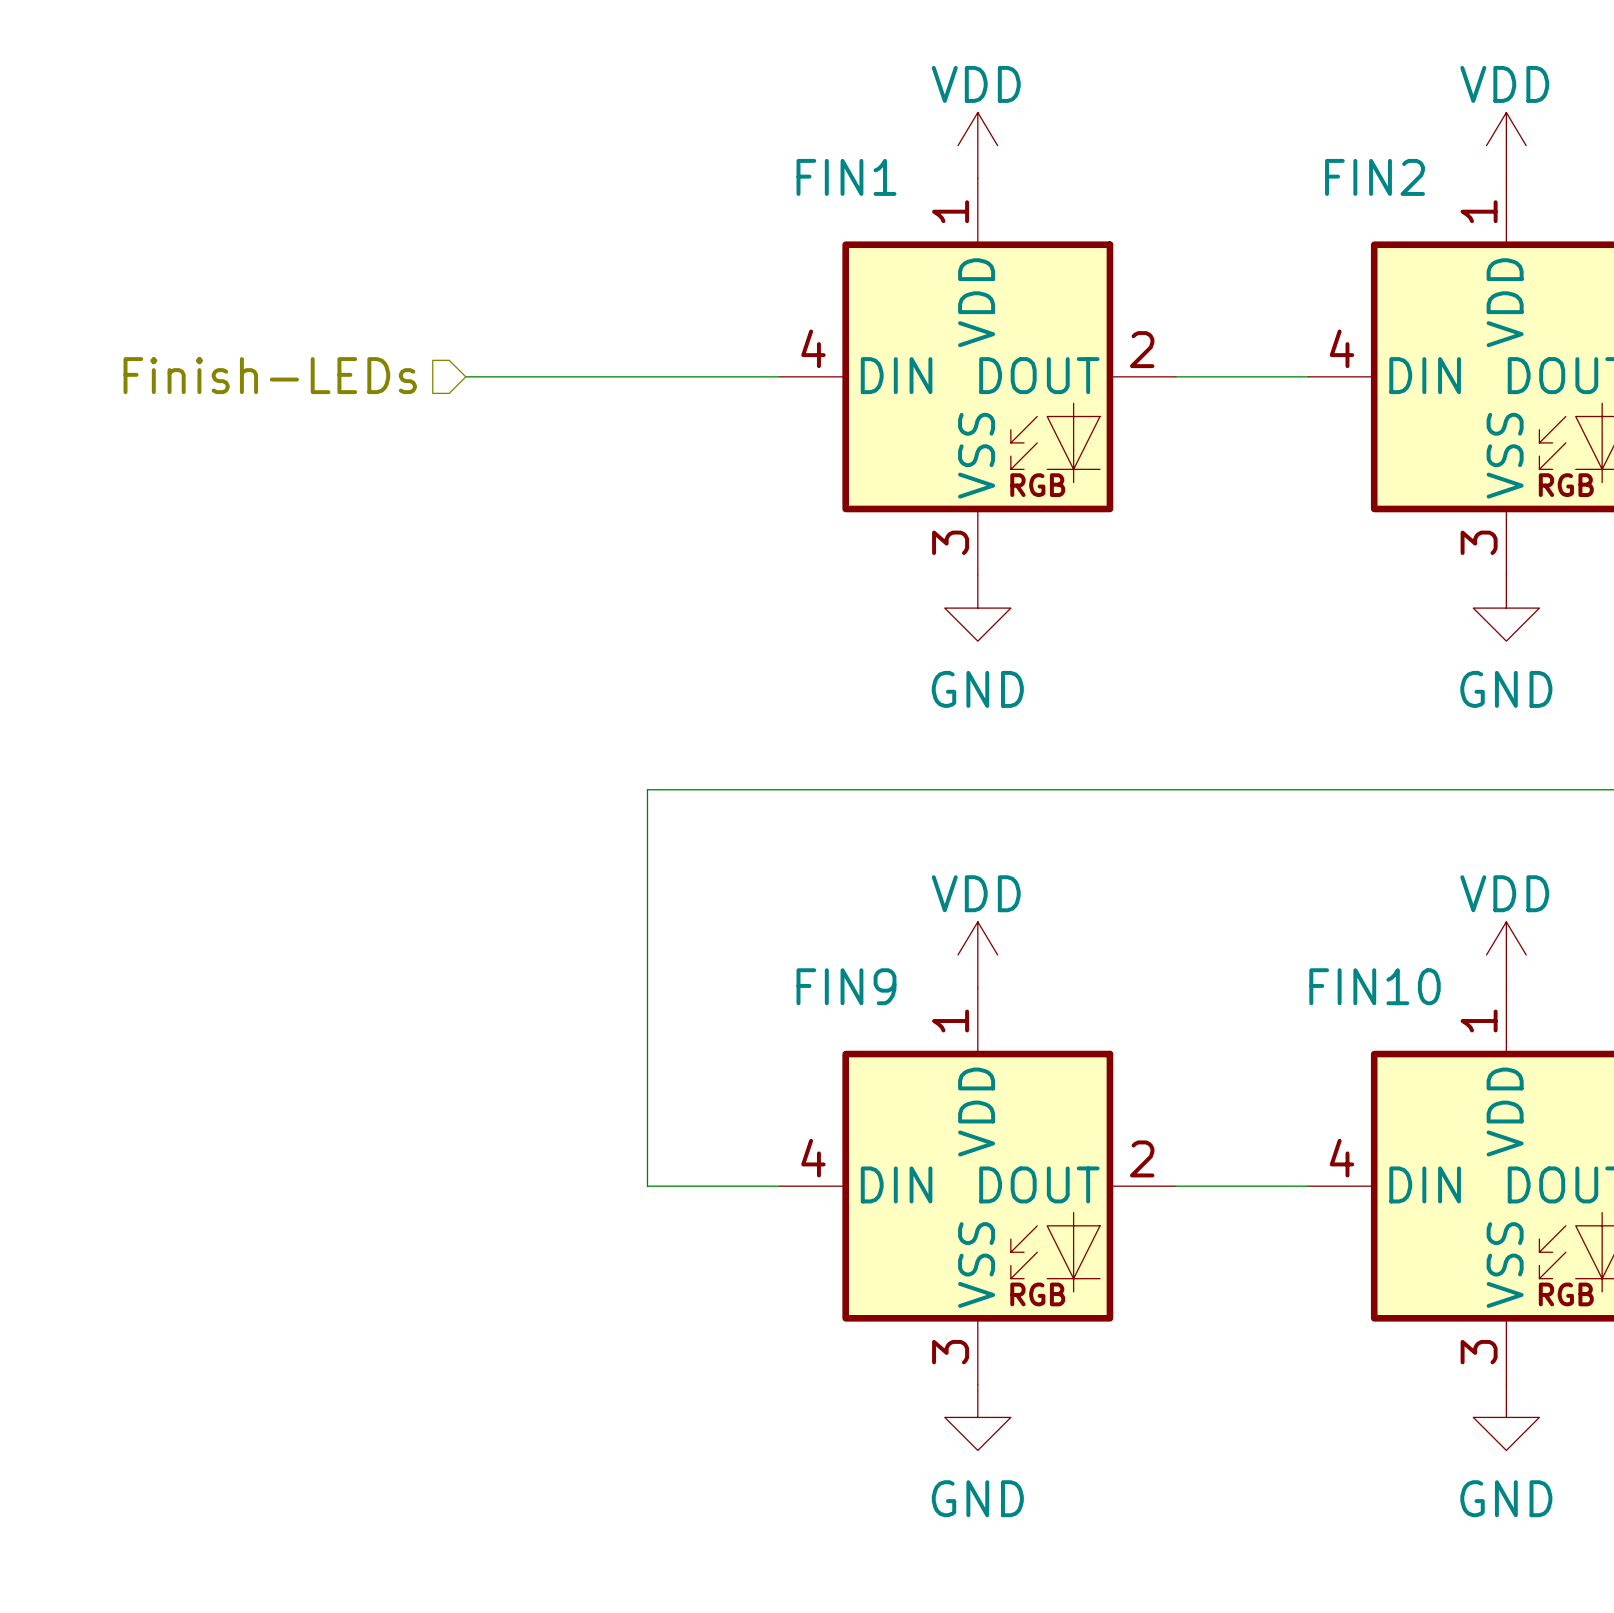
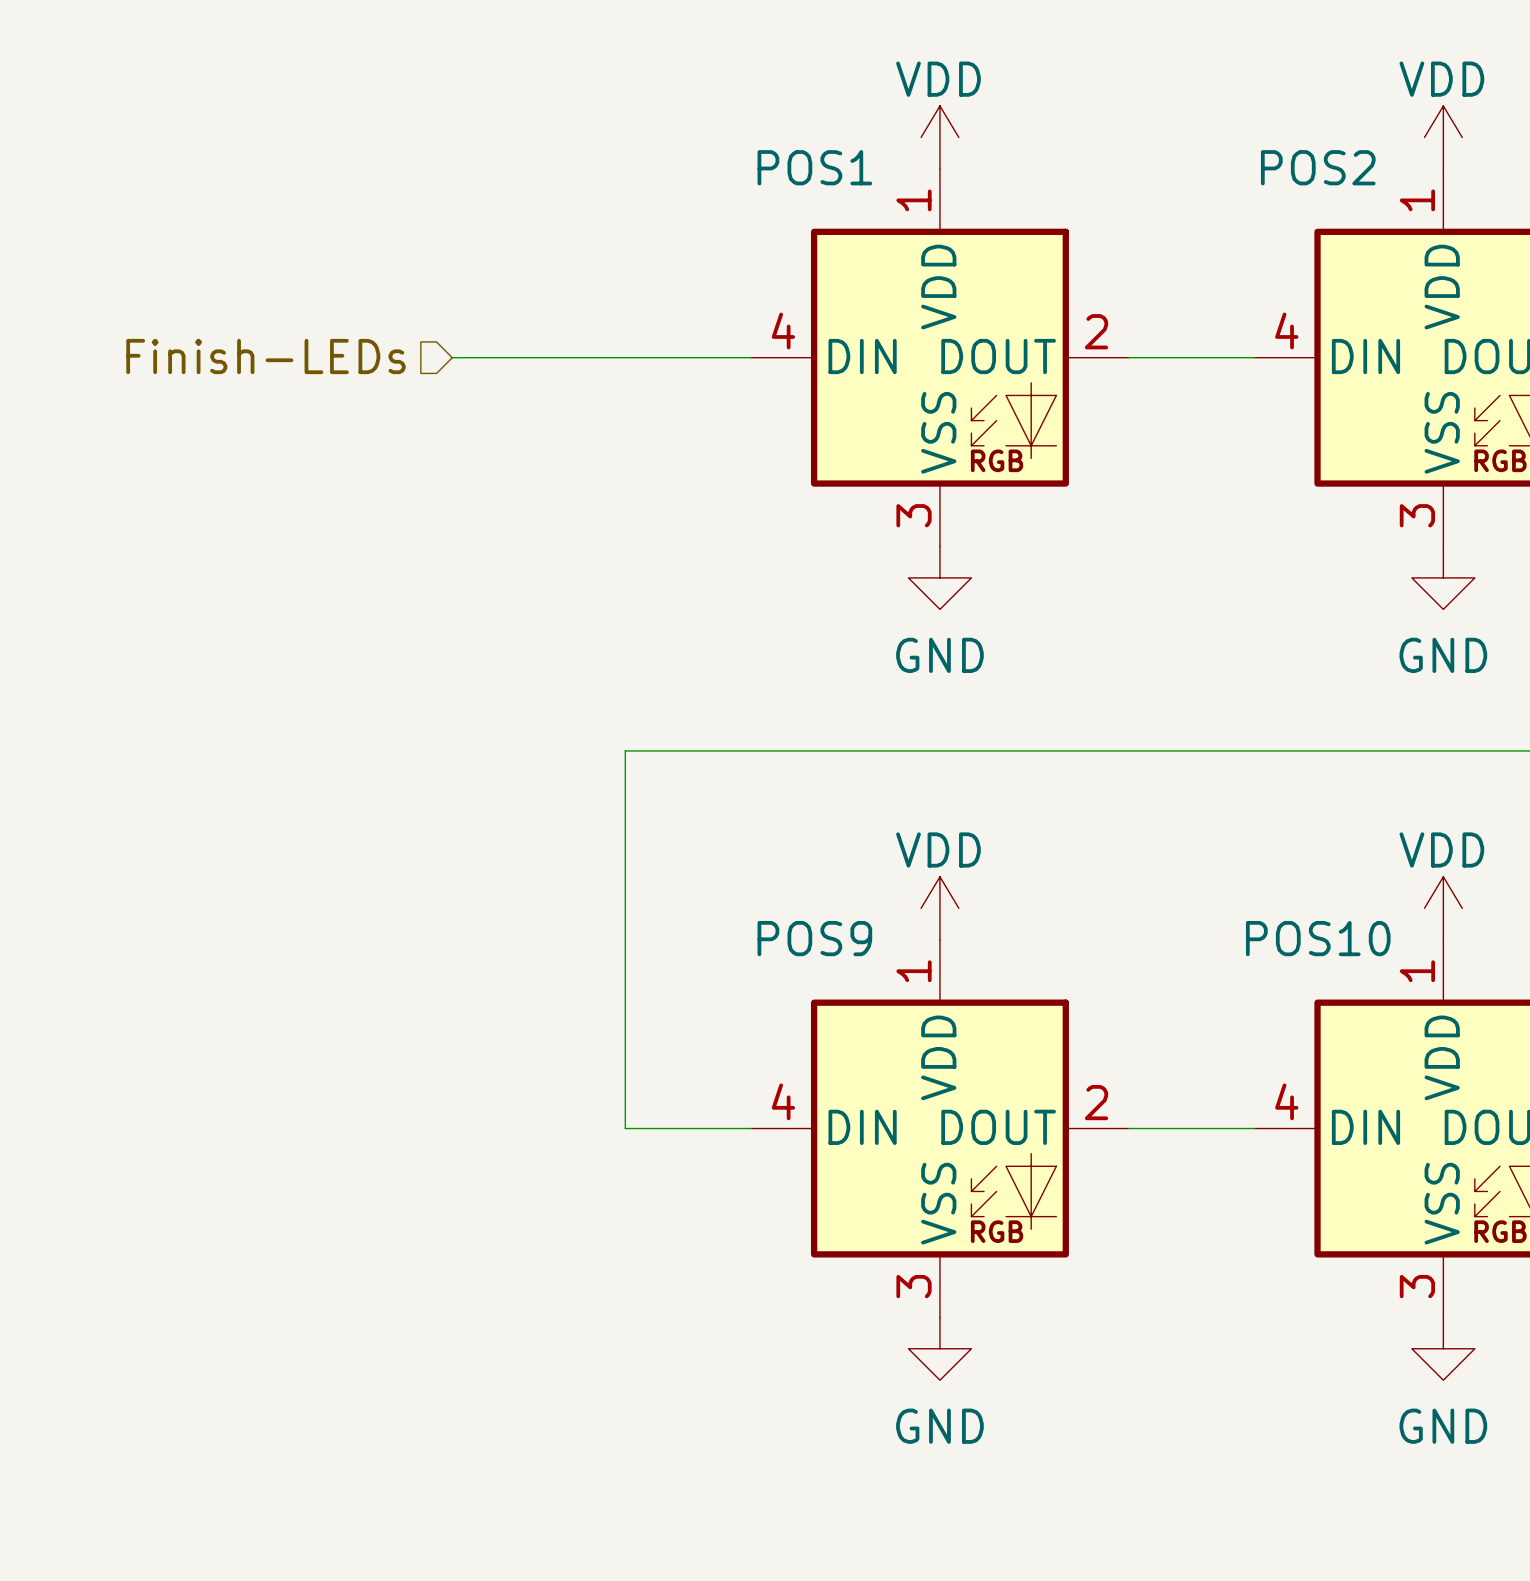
FIN1 name: FIN1 (846, 177) -> POS1 (814, 167)
FIN2 name: FIN2 (1375, 177) -> POS2 (1318, 167)
FIN9 name: FIN9 (846, 986) -> POS9 (814, 938)
FIN10 name: FIN10 (1375, 986) -> POS10 (1318, 938)

